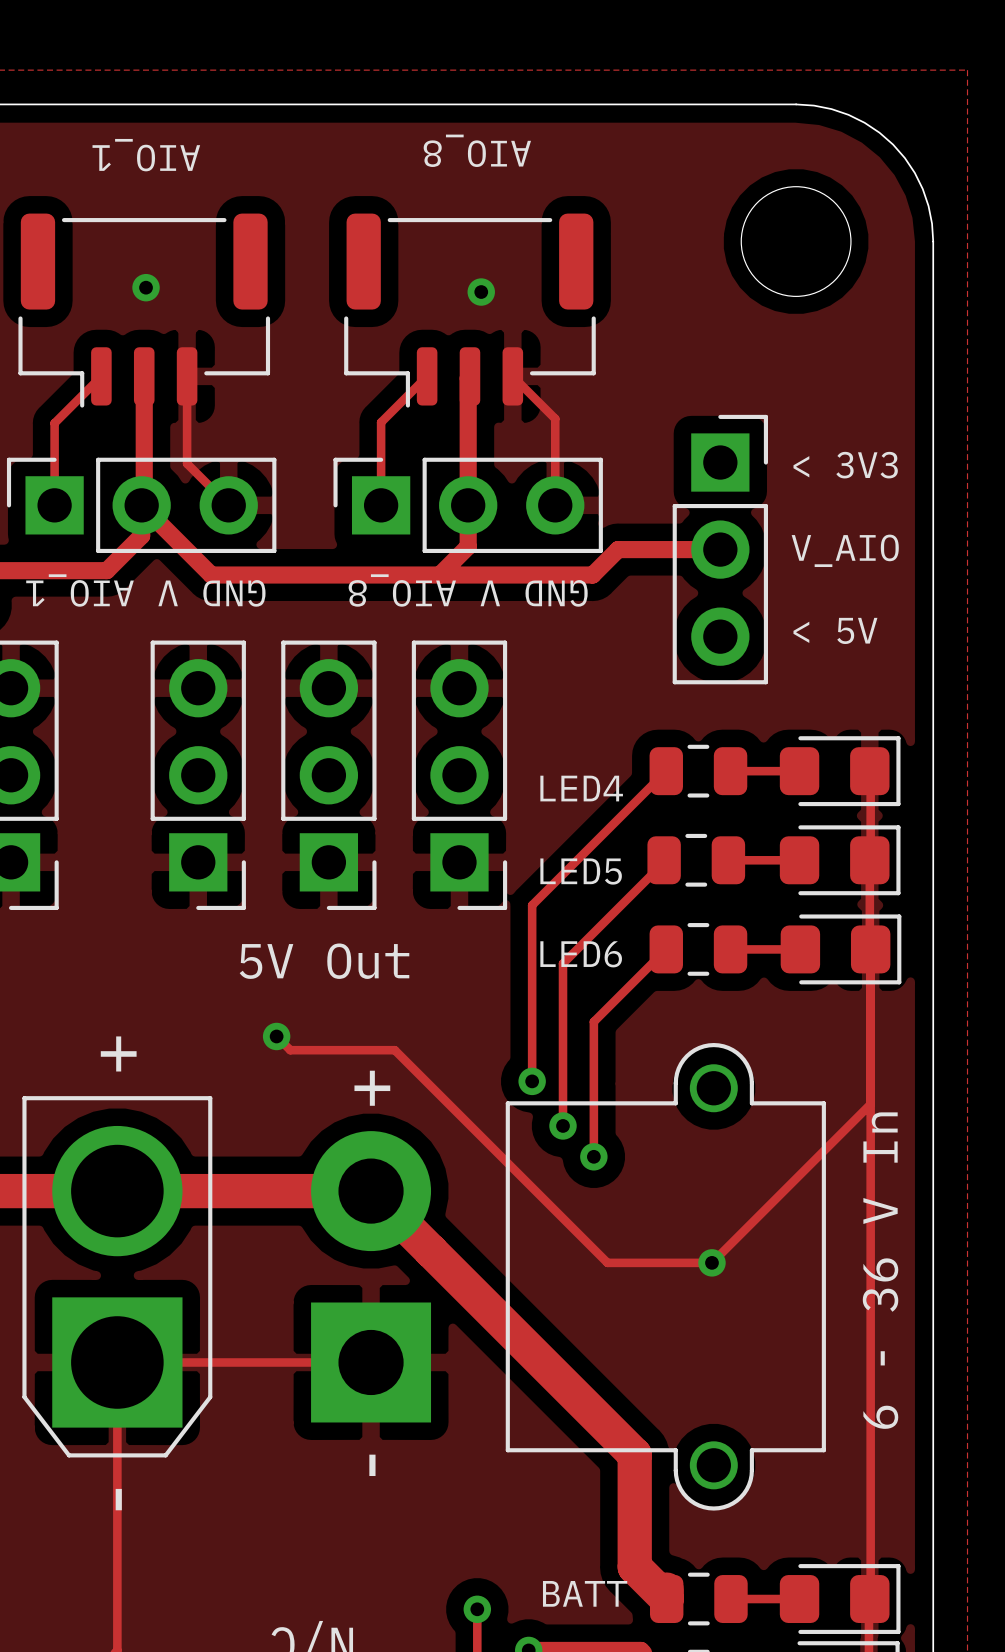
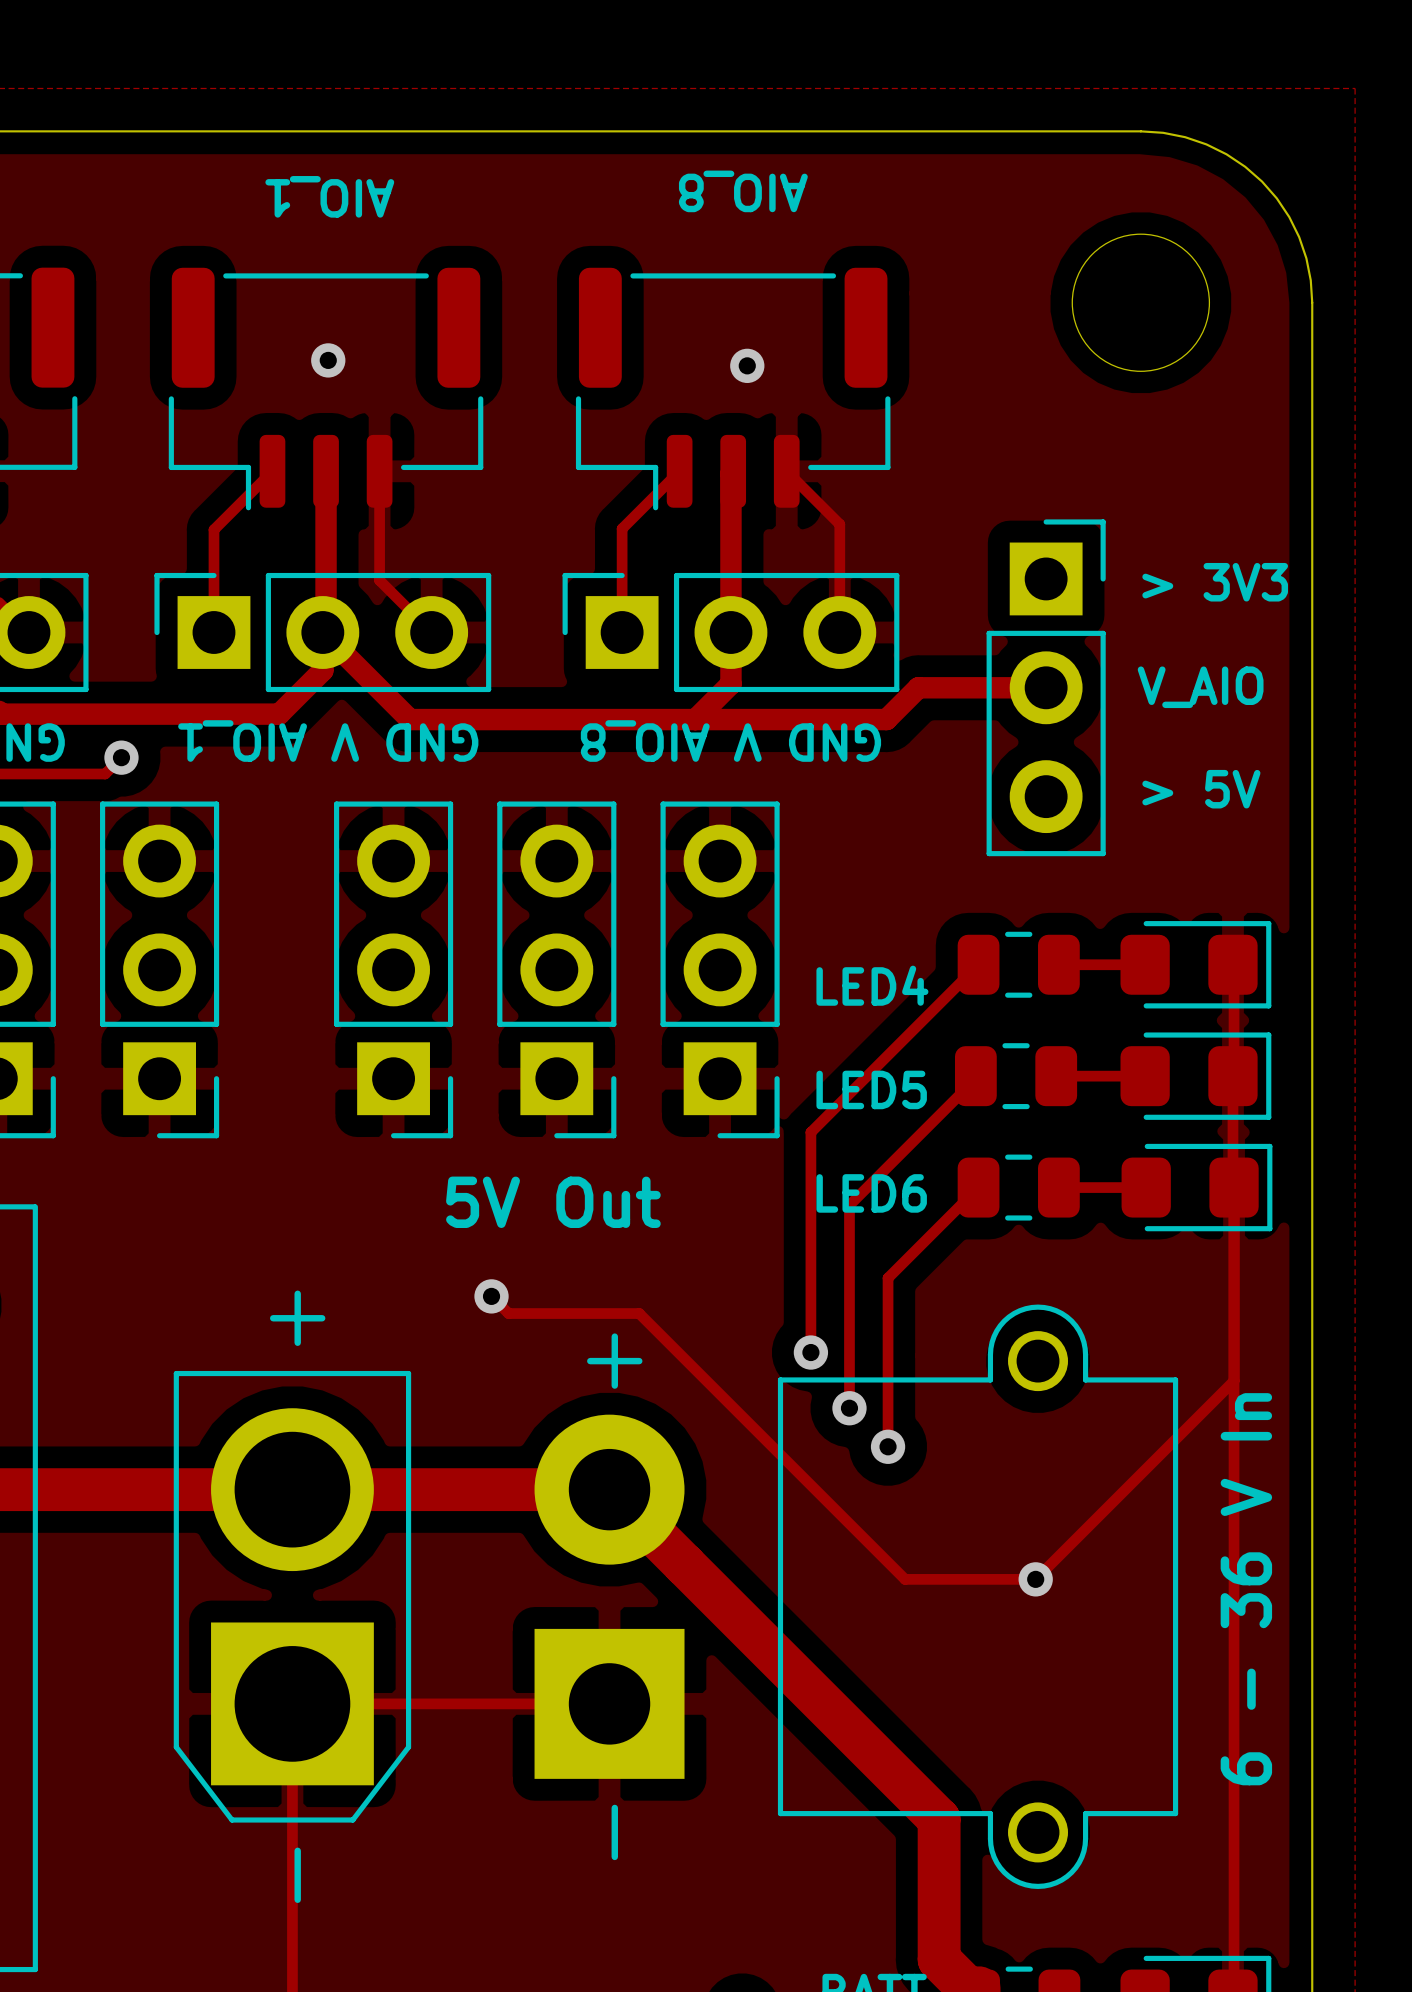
text: < 3V3 (845, 465) -> > 3V3 (1215, 582)
text: < 5V (835, 630) -> > 5V (1201, 789)

